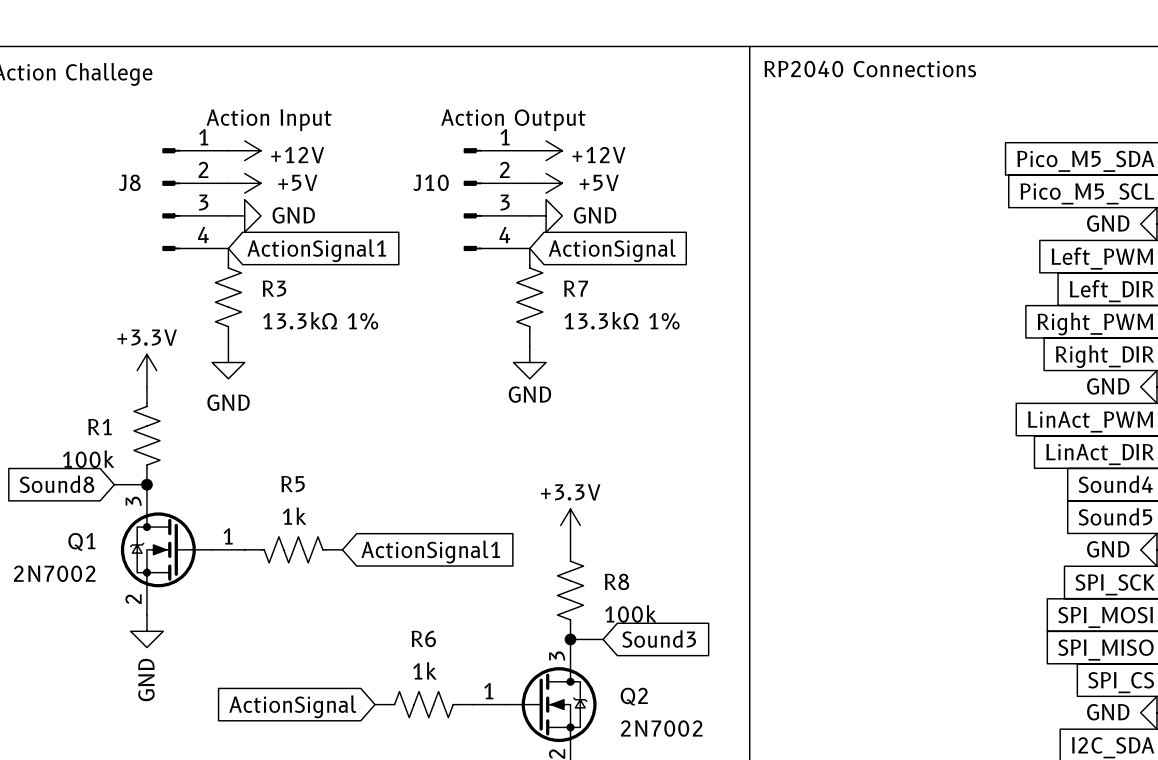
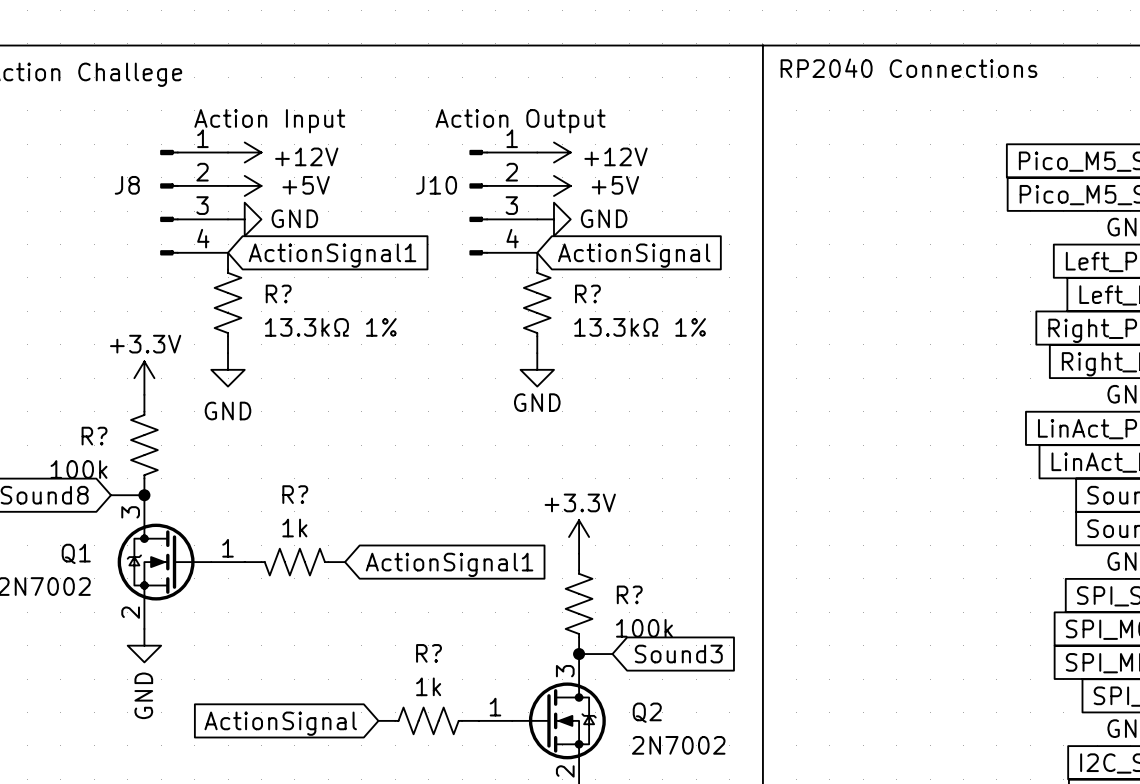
R3 name: R3 (274, 288) -> R? (278, 293)
R7 name: R7 (576, 288) -> R? (587, 293)
R1 name: R1 (99, 427) -> R? (94, 436)
R5 name: R5 (293, 484) -> R? (295, 494)
R8 name: R8 (616, 581) -> R? (629, 594)
R6 name: R6 (423, 638) -> R? (429, 653)

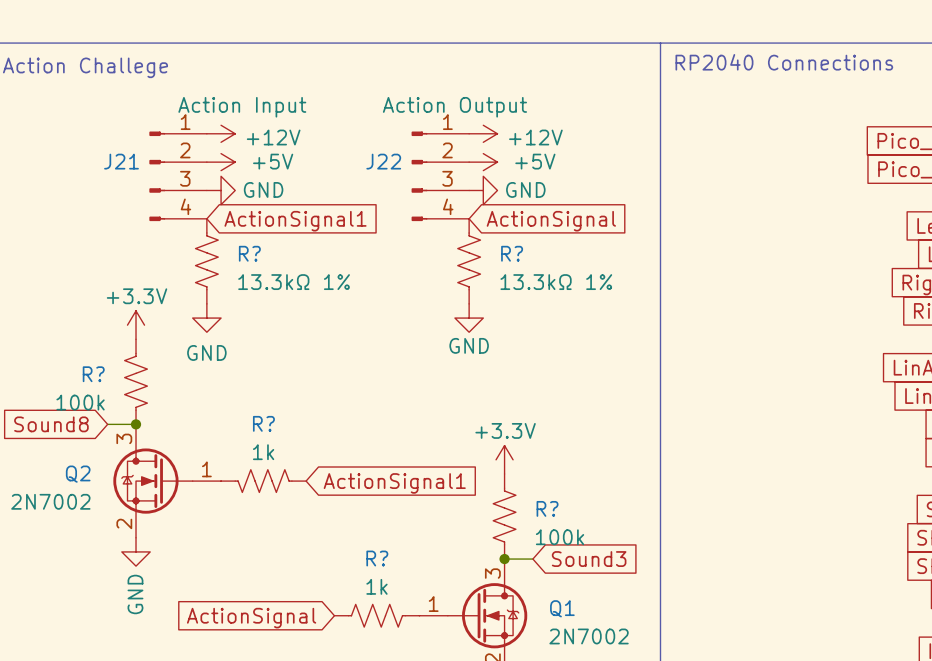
J8 name: J8 (127, 185) -> J21 (121, 161)
J10 name: J10 (436, 185) -> J22 (383, 161)
Q1 name: Q1 (76, 553) -> Q2 (78, 474)
Q2 name: Q2 (647, 712) -> Q1 (562, 608)

